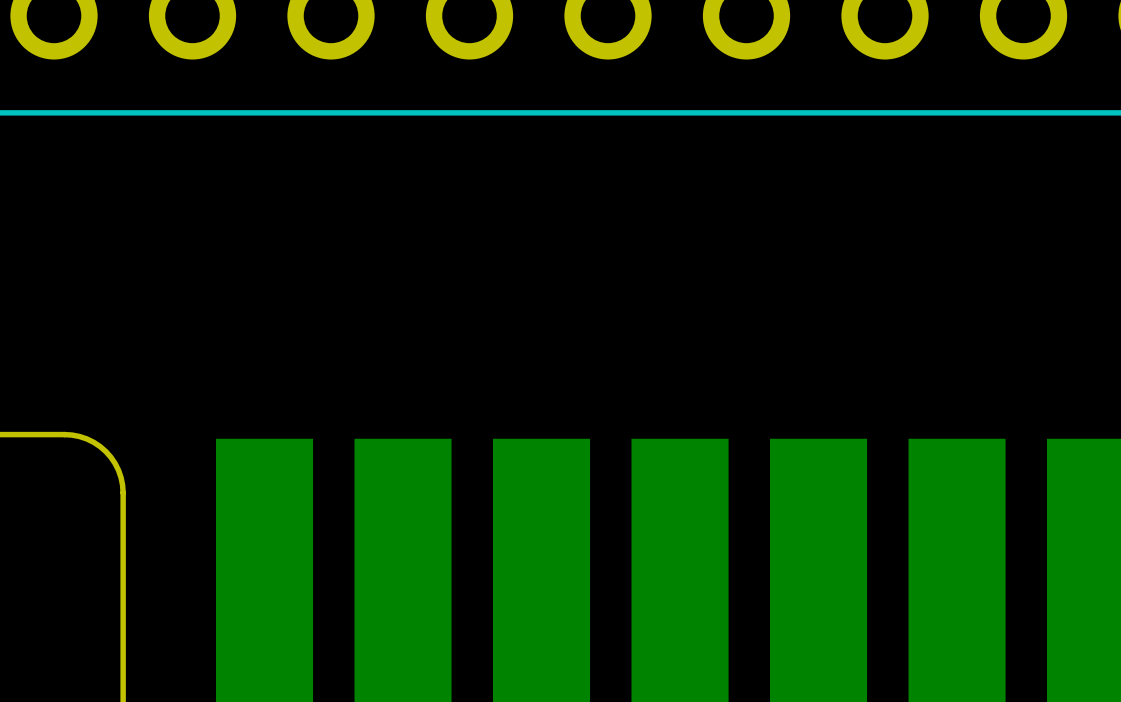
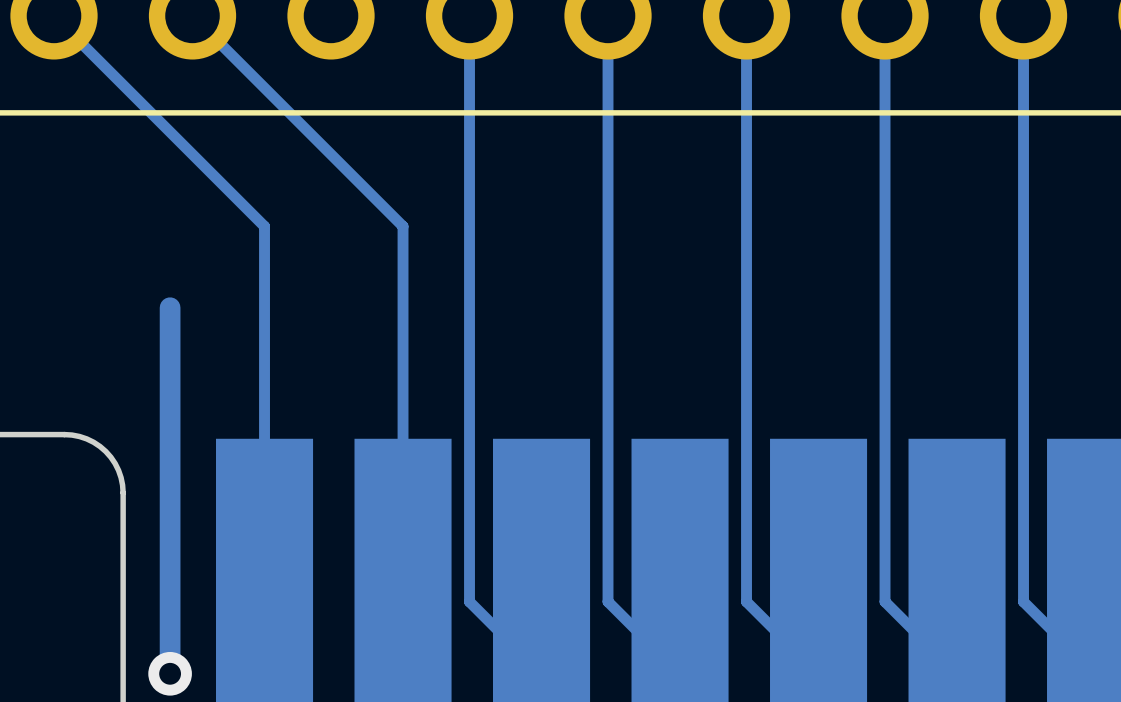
track: none -> (54, 15) (264, 226) (264, 673)
track: none -> (192, 15) (403, 226) (403, 673)
track: none -> (469, 15) (469, 601) (541, 673)
track: none -> (608, 15) (608, 601) (680, 673)
track: none -> (746, 15) (746, 601) (818, 673)
track: none -> (885, 15) (885, 601) (957, 673)
track: none -> (1023, 15) (1023, 601) (1095, 673)
track: none -> (170, 307) (170, 673)
via: none -> (170, 673)

